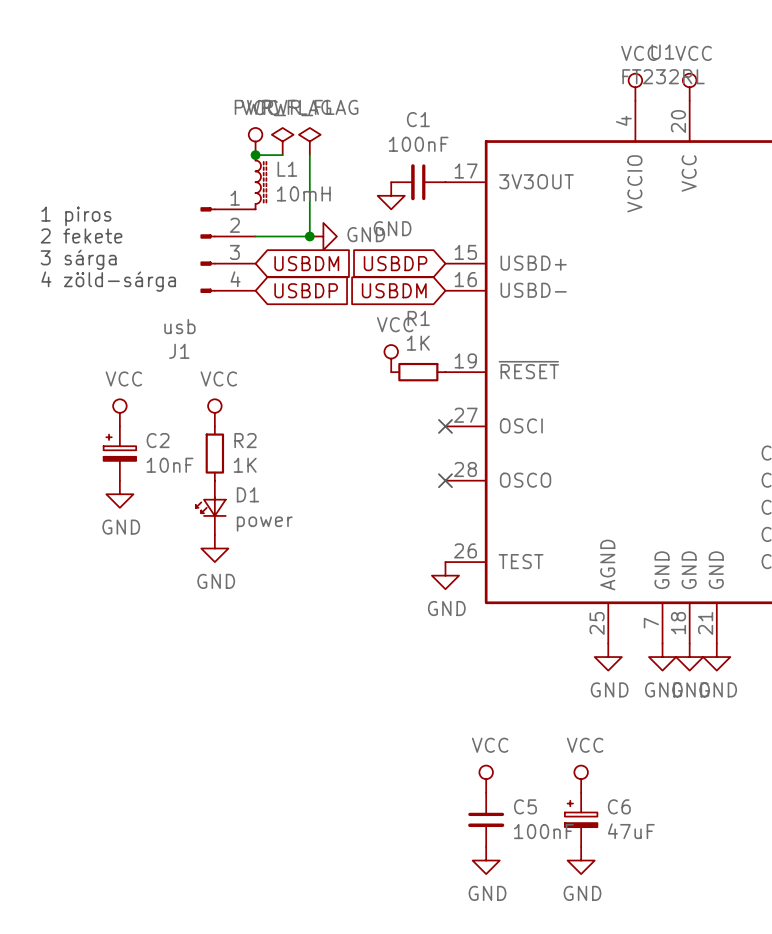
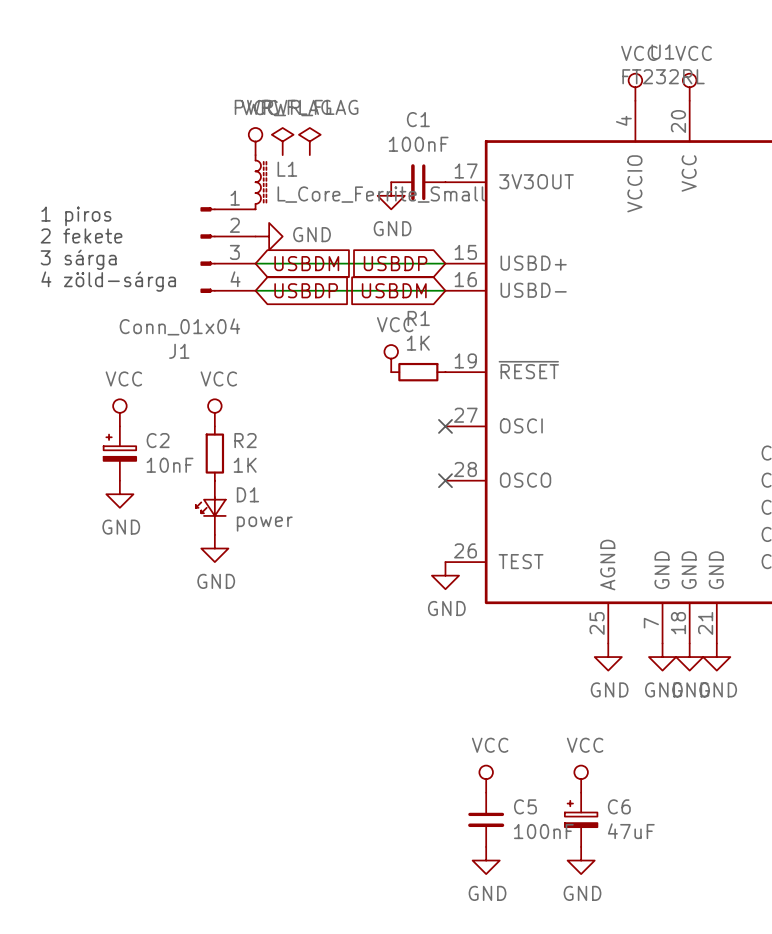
wire: (255, 155) (282, 155) -> none
junction: (255, 155) -> none
wire: (309, 155) (309, 236) (255, 236) -> none
L1 value: 10mH (303, 193) -> L_Core_Ferrite_Small (381, 194)
junction: (309, 236) -> none
power symbol position: GND (323, 236) -> GND (269, 236)
wire: none -> (255, 263) (445, 263)
wire: none -> (255, 290) (445, 290)
J1 value: usb (179, 326) -> Conn_01x04 (179, 326)

